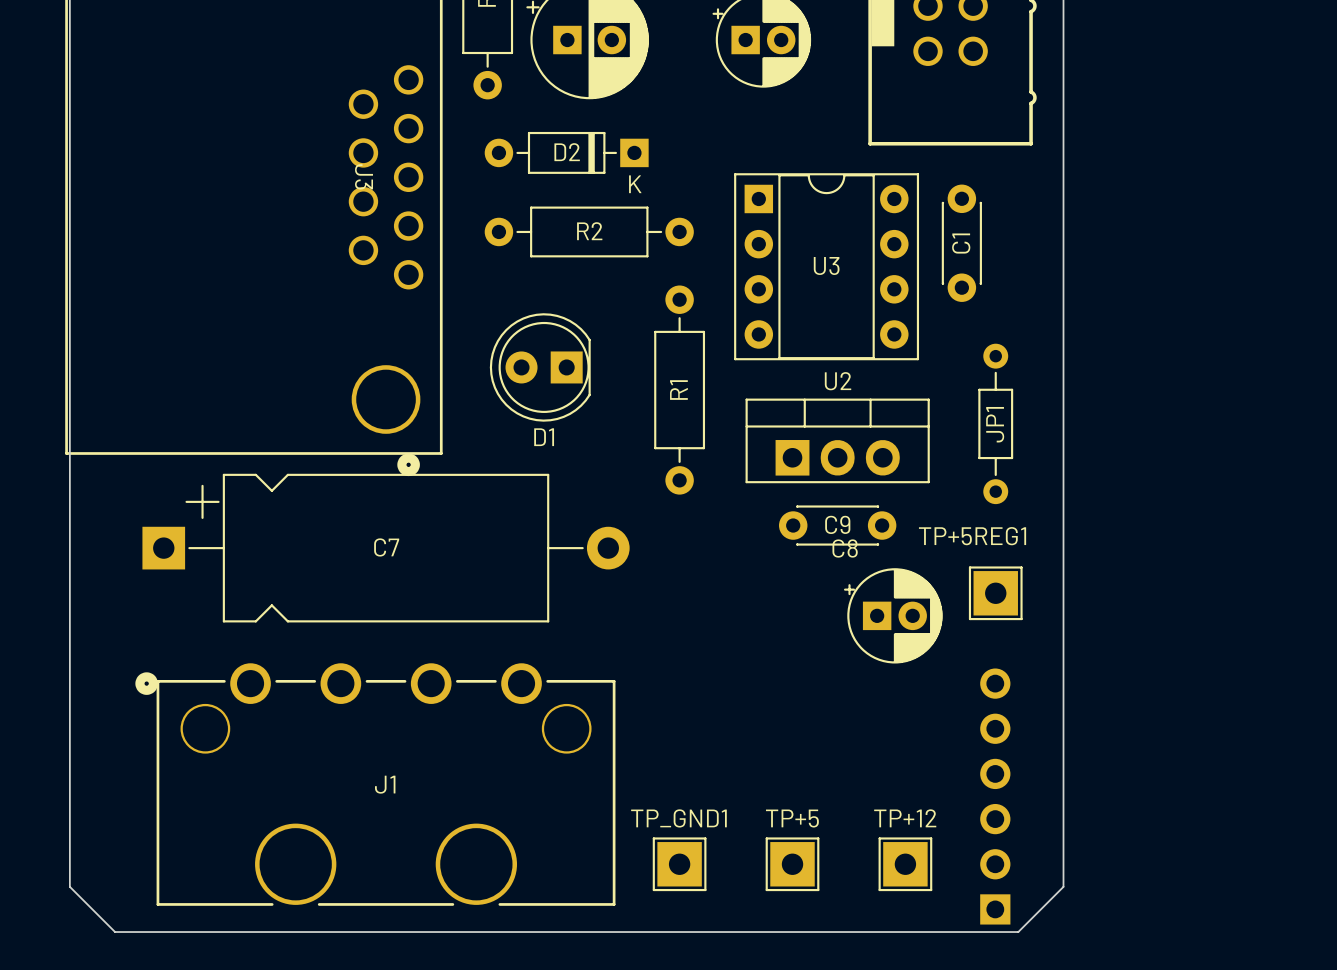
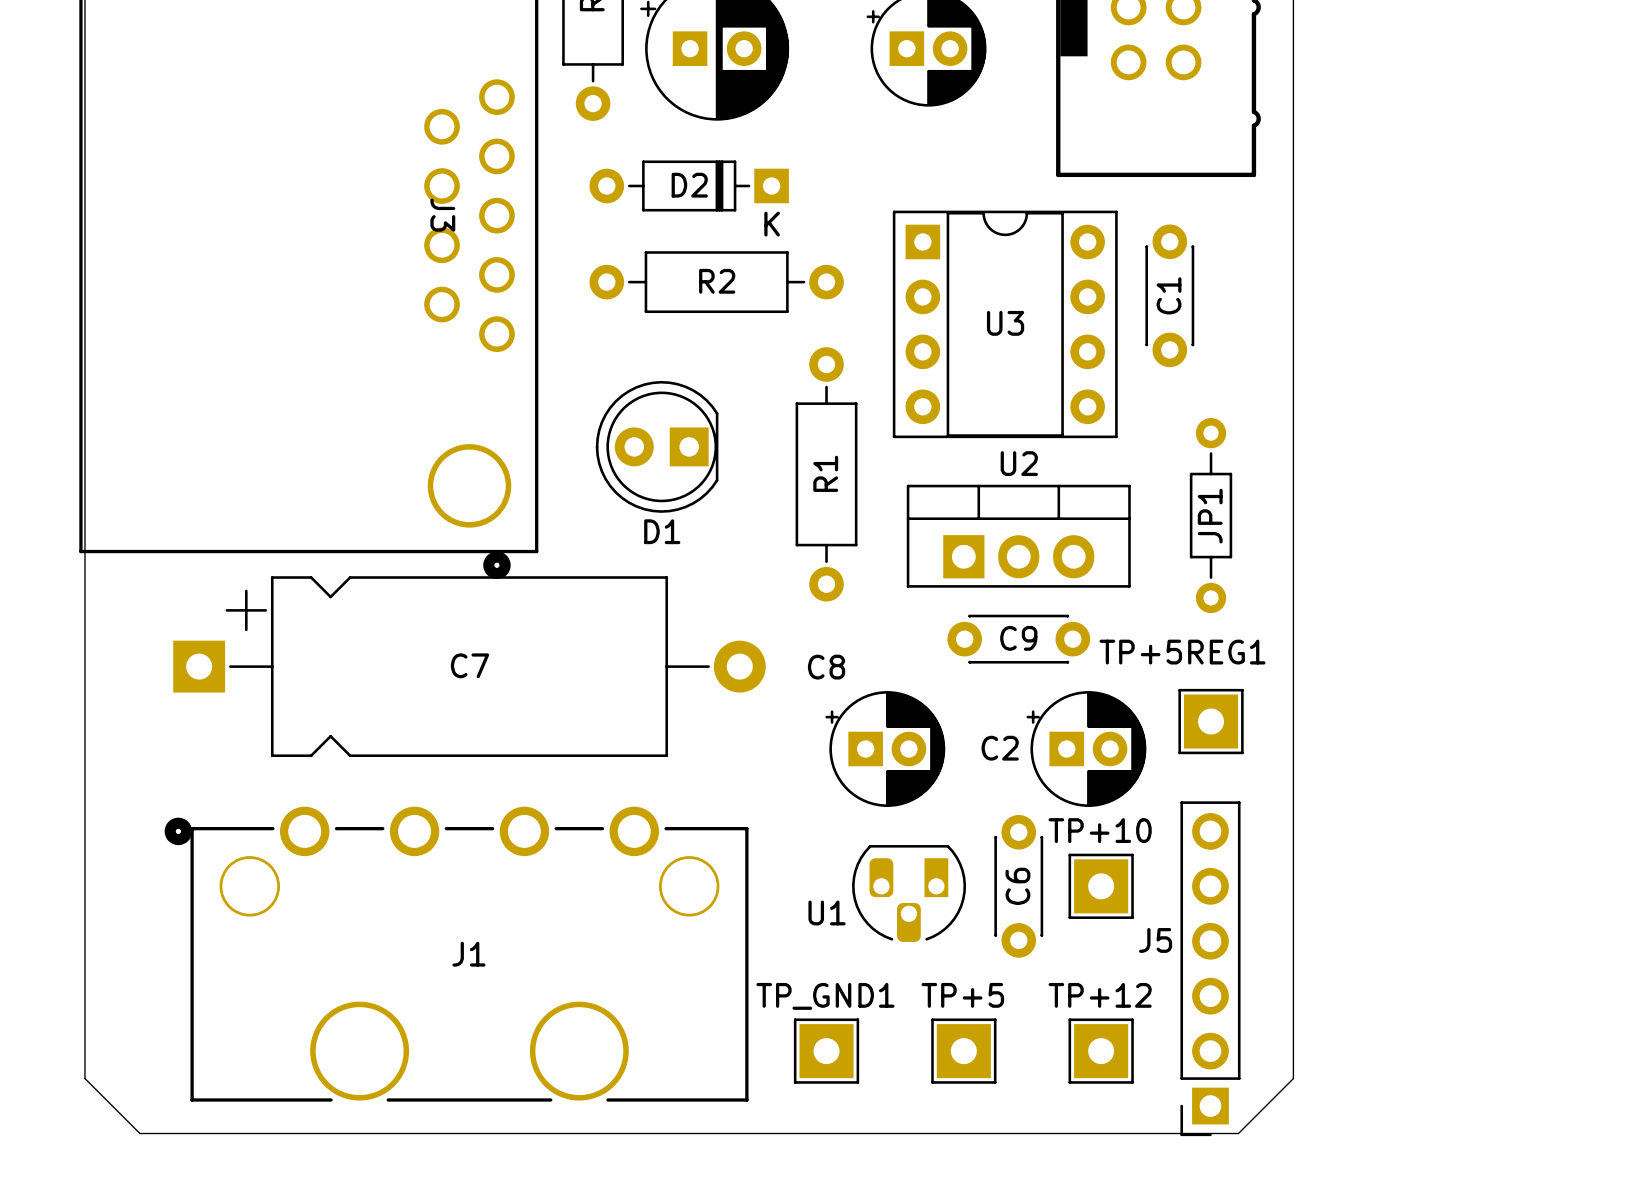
C8 name: C8 (845, 548) -> C2 (1000, 748)
C8: none -> (885, 749)
C6: none -> (1018, 886)
TP+10: none -> (1101, 886)
U1: none -> (909, 893)
J5 side: bottom (995, 796) -> top (1210, 968)

